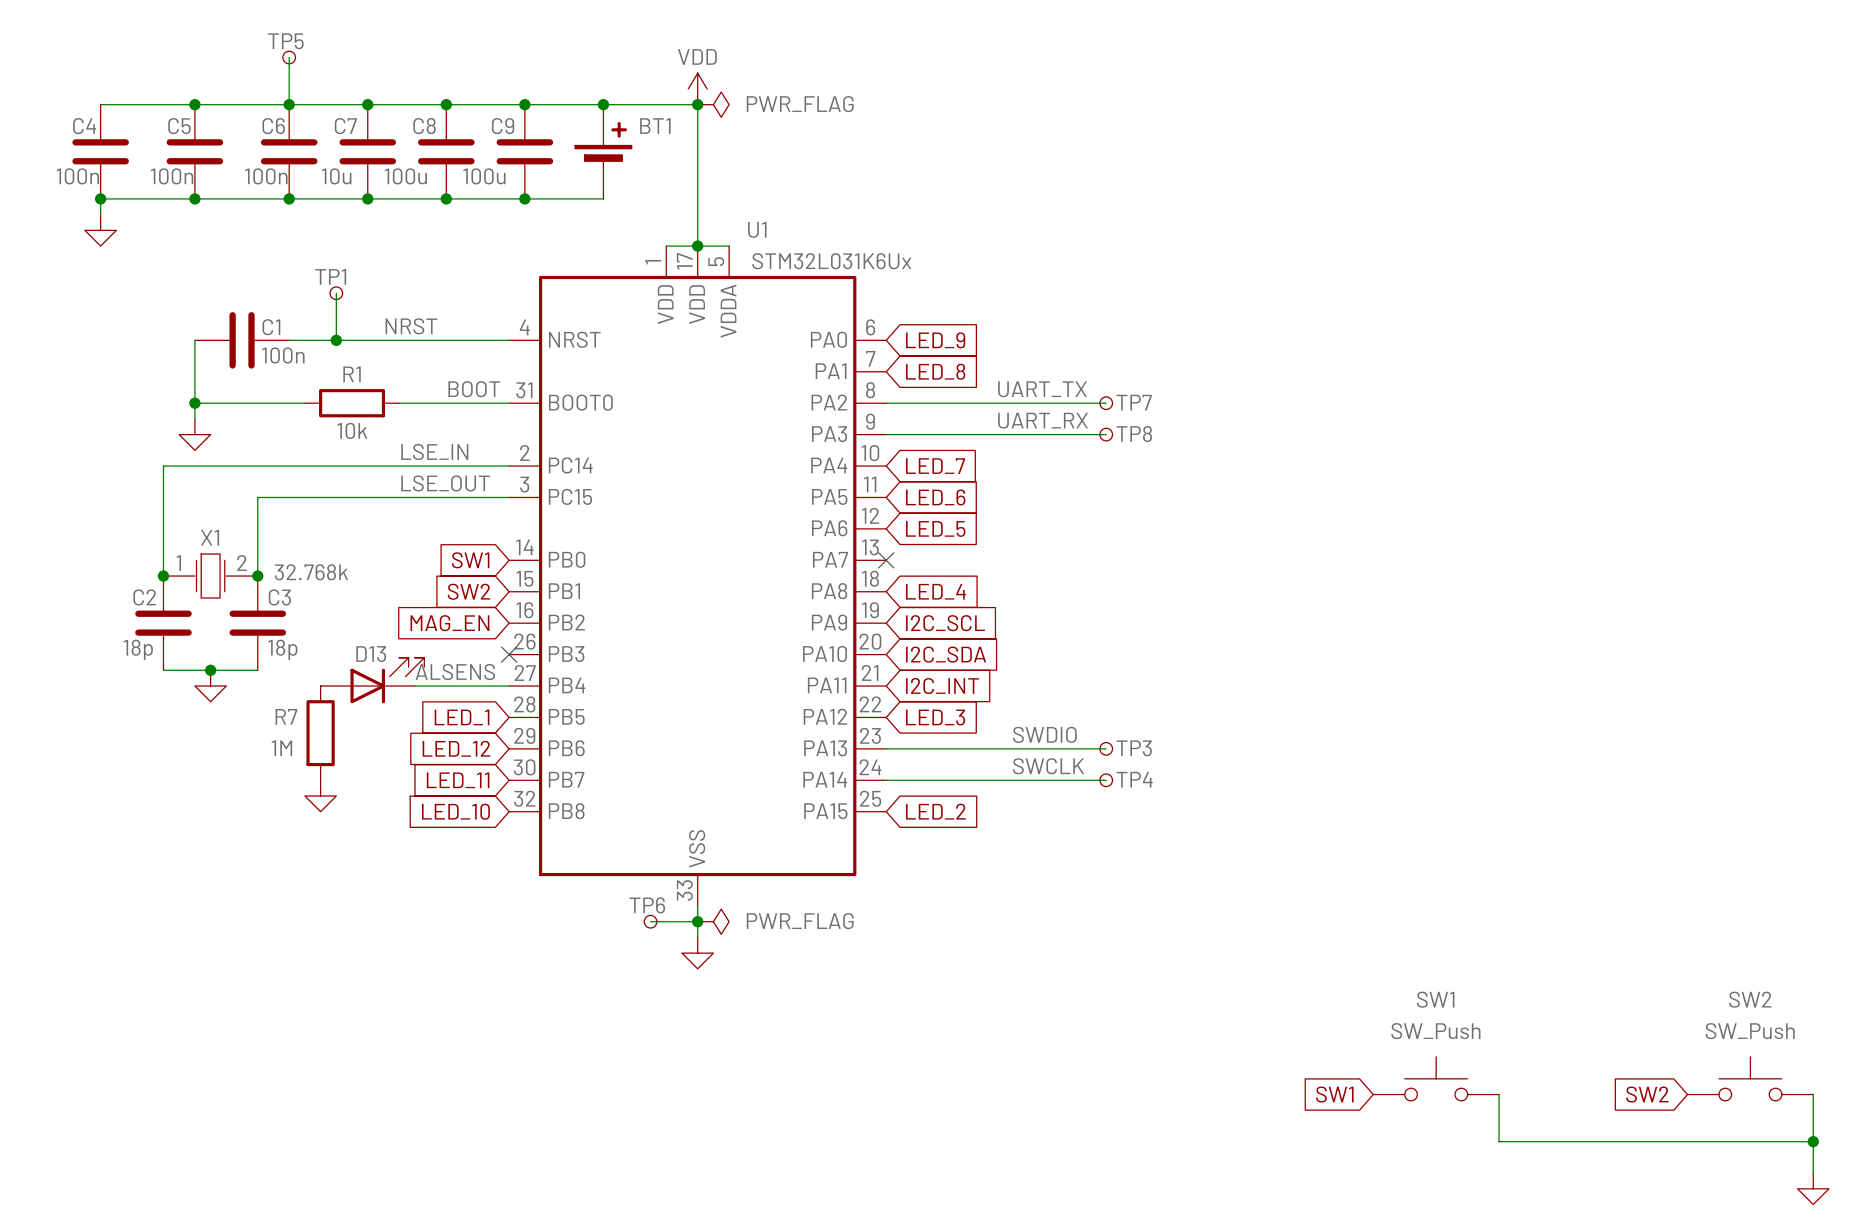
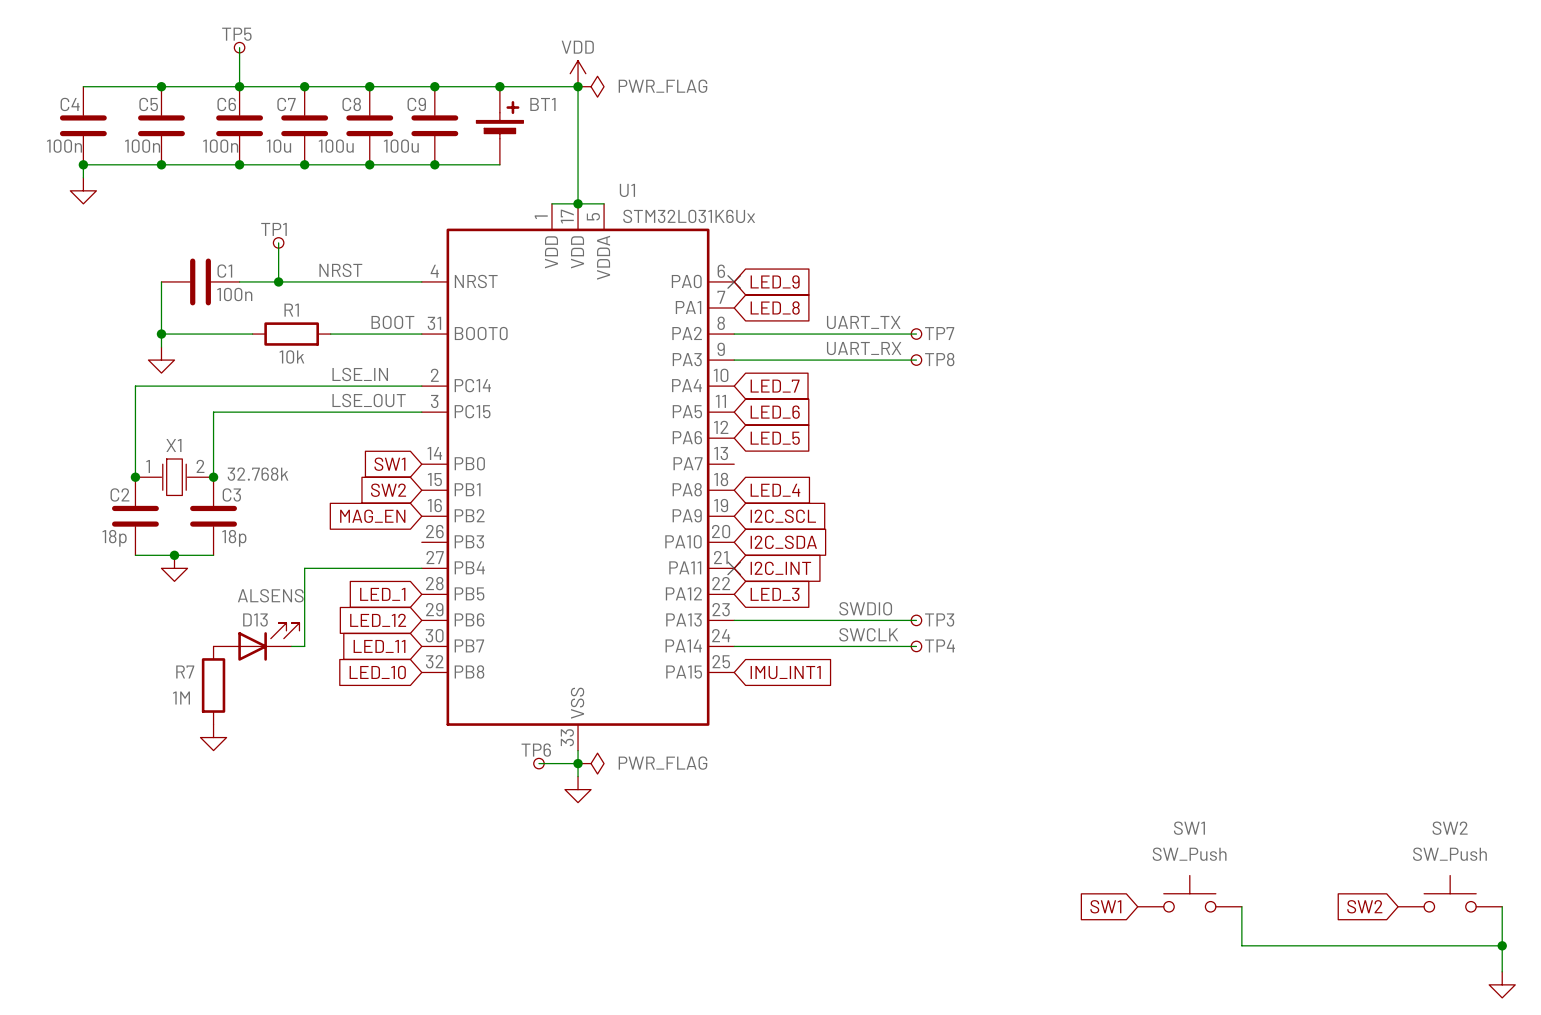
no-connect mark: none -> (734, 281)
no-connect mark: (886, 560) -> none
no-connect mark: (509, 654) -> none
label position: ALSENS (455, 672) -> ALSENS (270, 595)
D13 position: (372, 680) -> (256, 641)
wire: none -> (343, 568) (304, 568) (304, 646) (291, 646)
no-connect mark: none -> (734, 568)
R7 position: (320, 733) -> (213, 685)
power symbol position: (320, 796) -> (213, 737)
global label: LED_2 (935, 811) -> IMU_INT1 (785, 672)

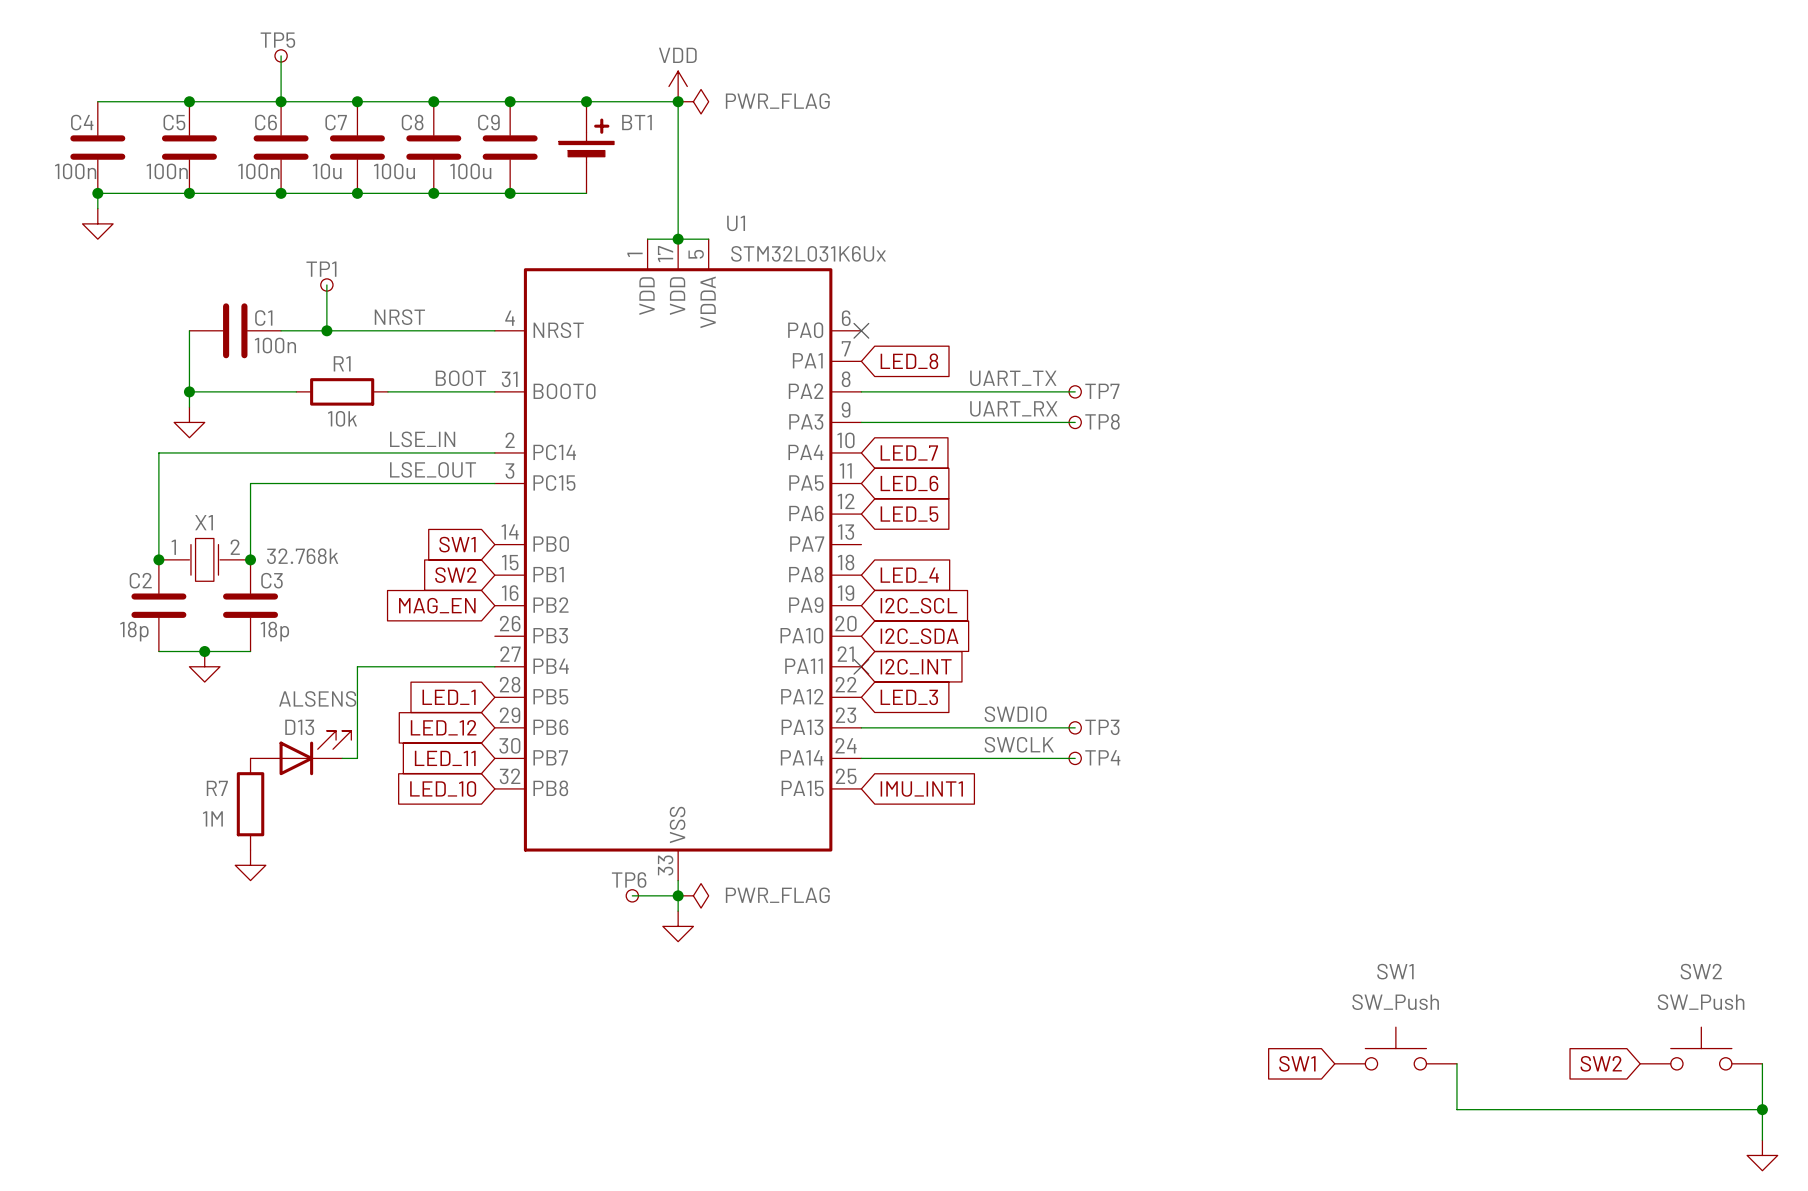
global label: LED_9 (775, 281) -> none

